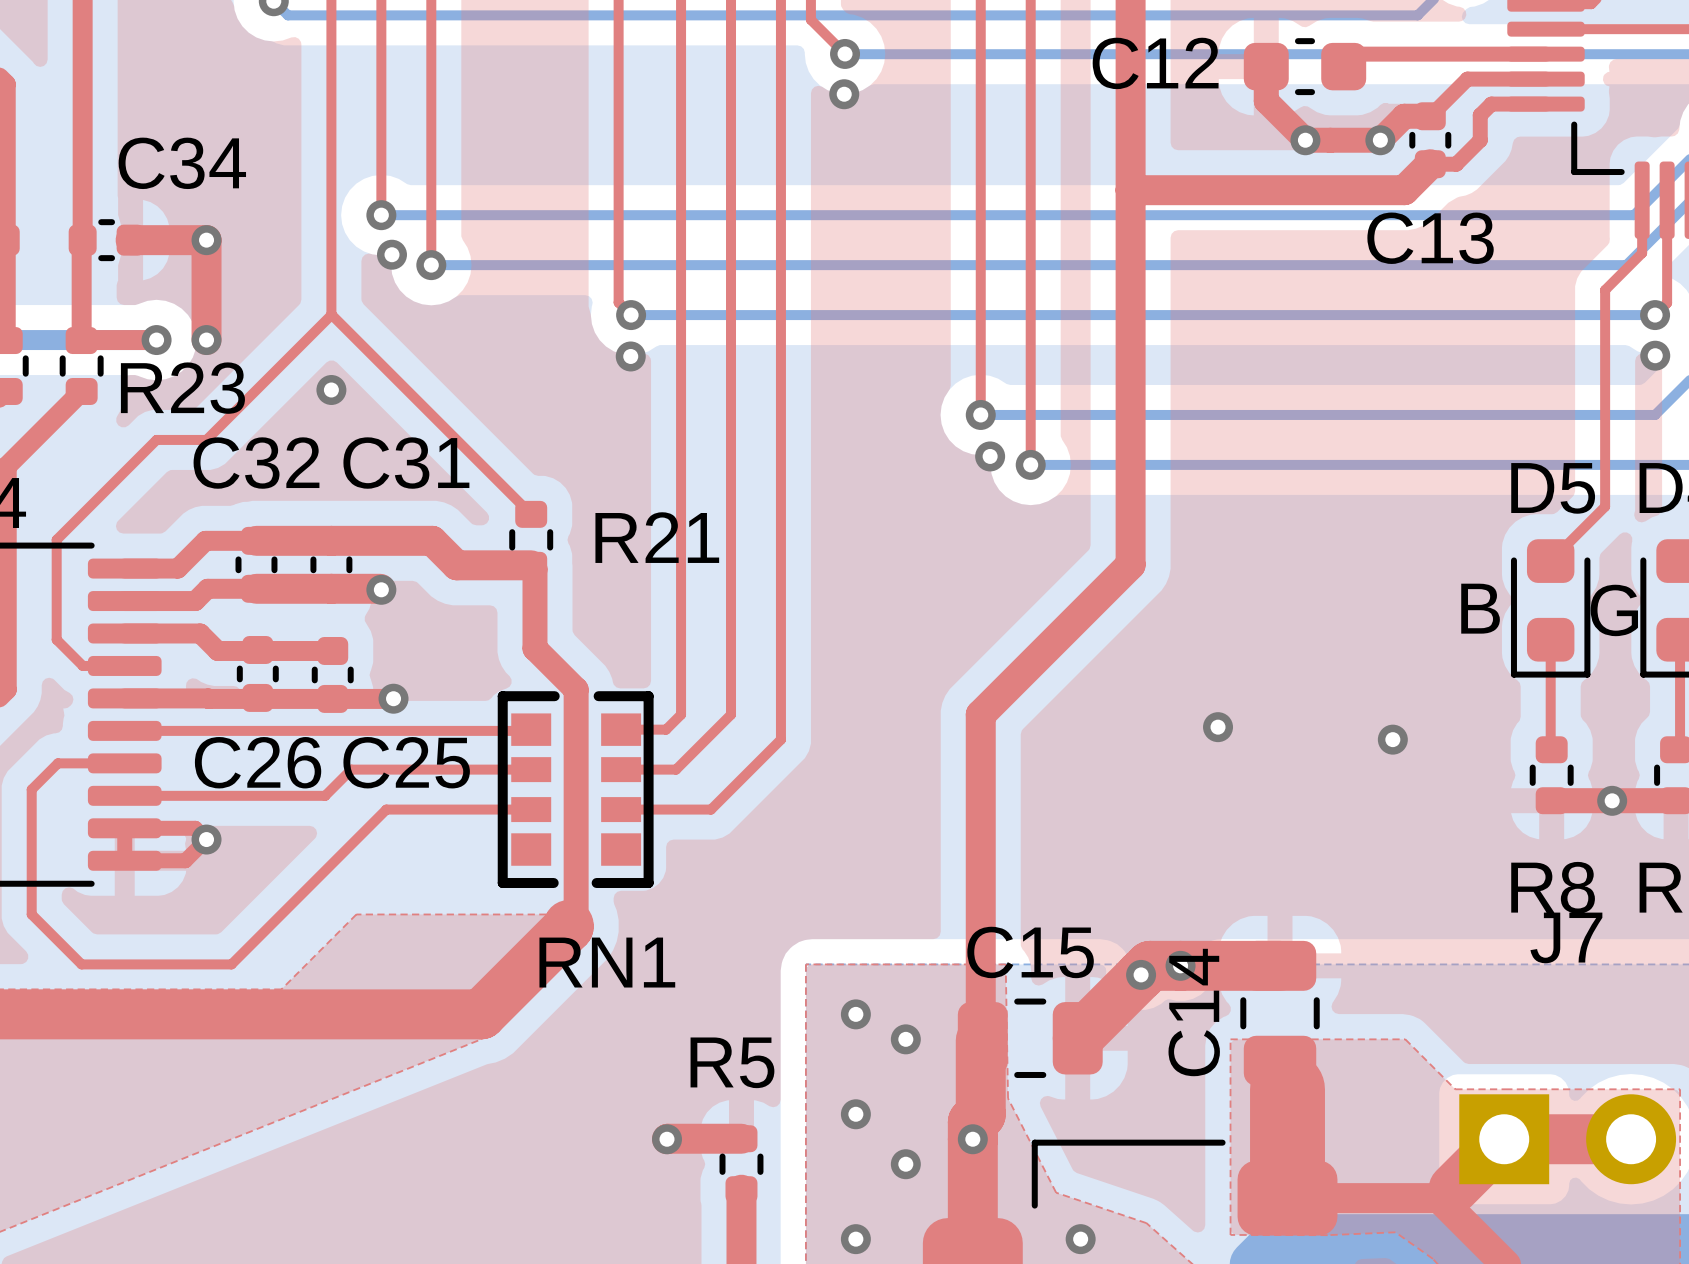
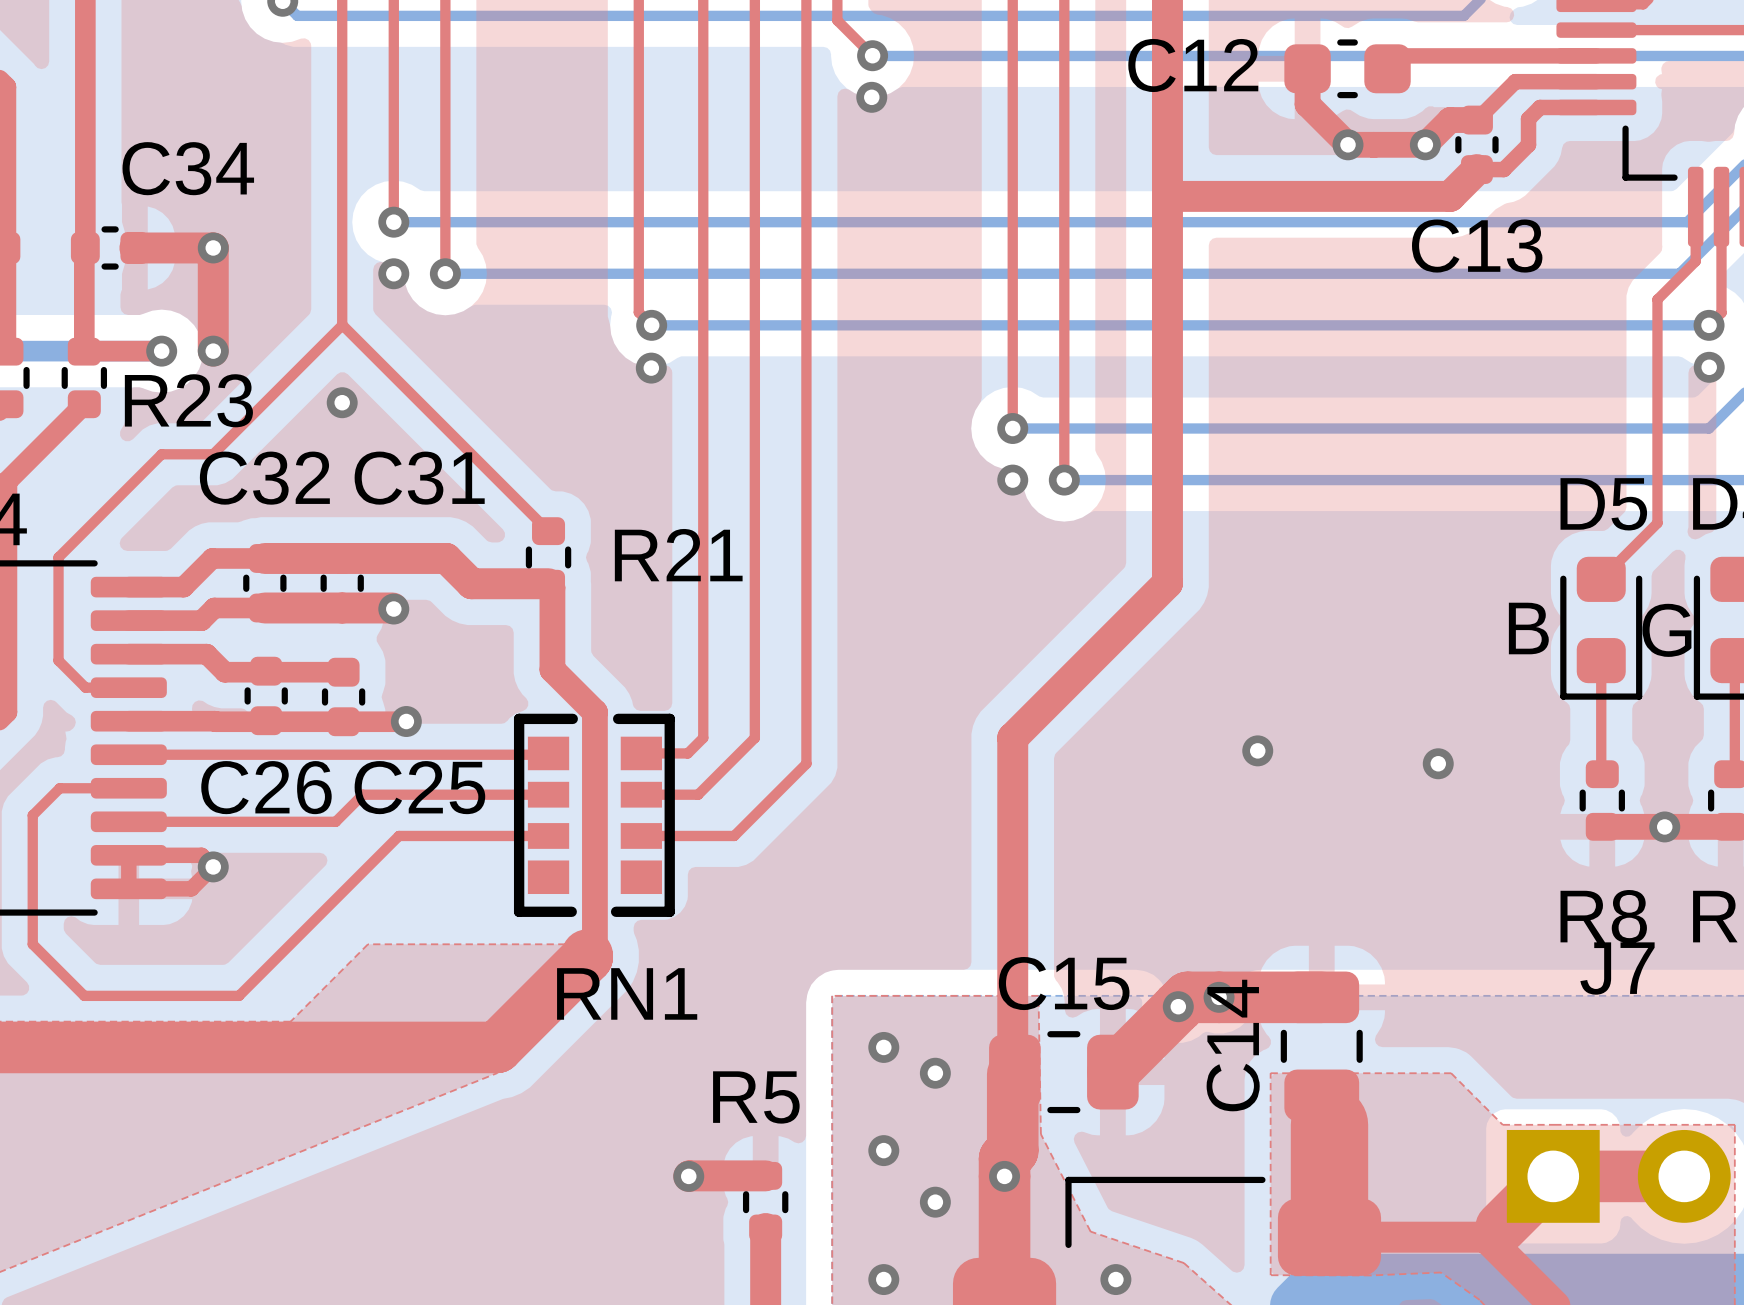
via position: (391, 254) -> (393, 273)
via position: (990, 456) -> (1012, 480)

